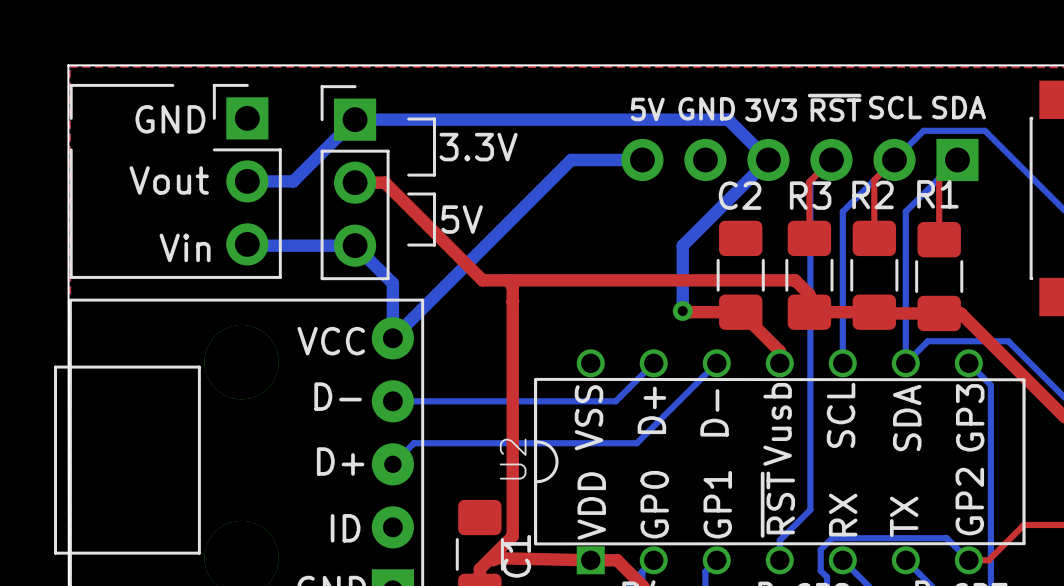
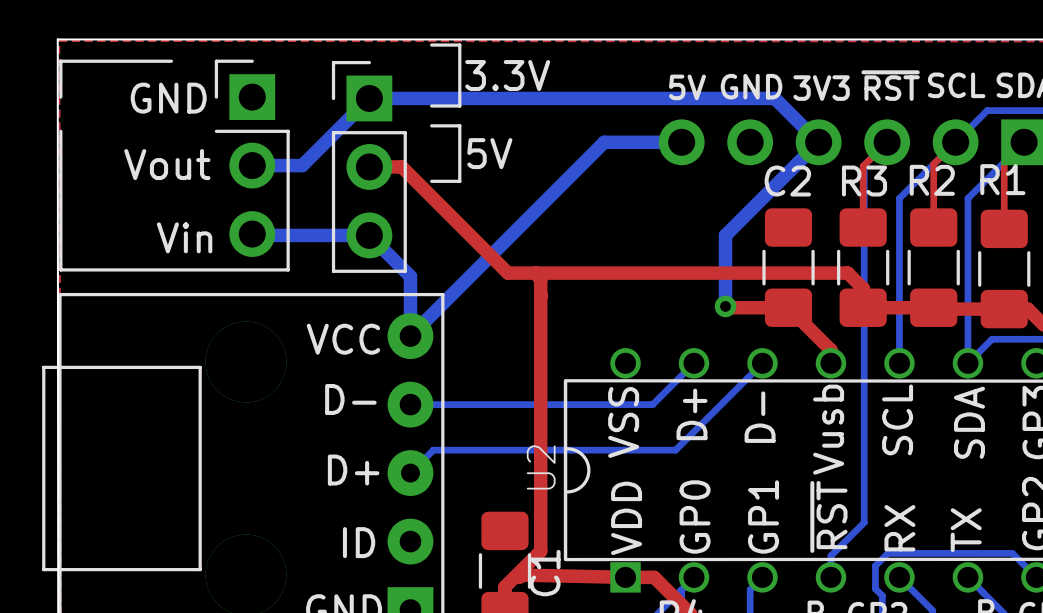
line: (408, 119) (434, 119) (434, 175) (408, 175) -> (431, 45) (459, 45) (459, 105) (431, 105)
text position: 3.3V (478, 147) -> 3.3V (507, 75)
line: (408, 194) (434, 194) (434, 245) (408, 245) -> (431, 125) (459, 125) (459, 181) (431, 181)
text position: 5V (462, 219) -> 5V (489, 153)

